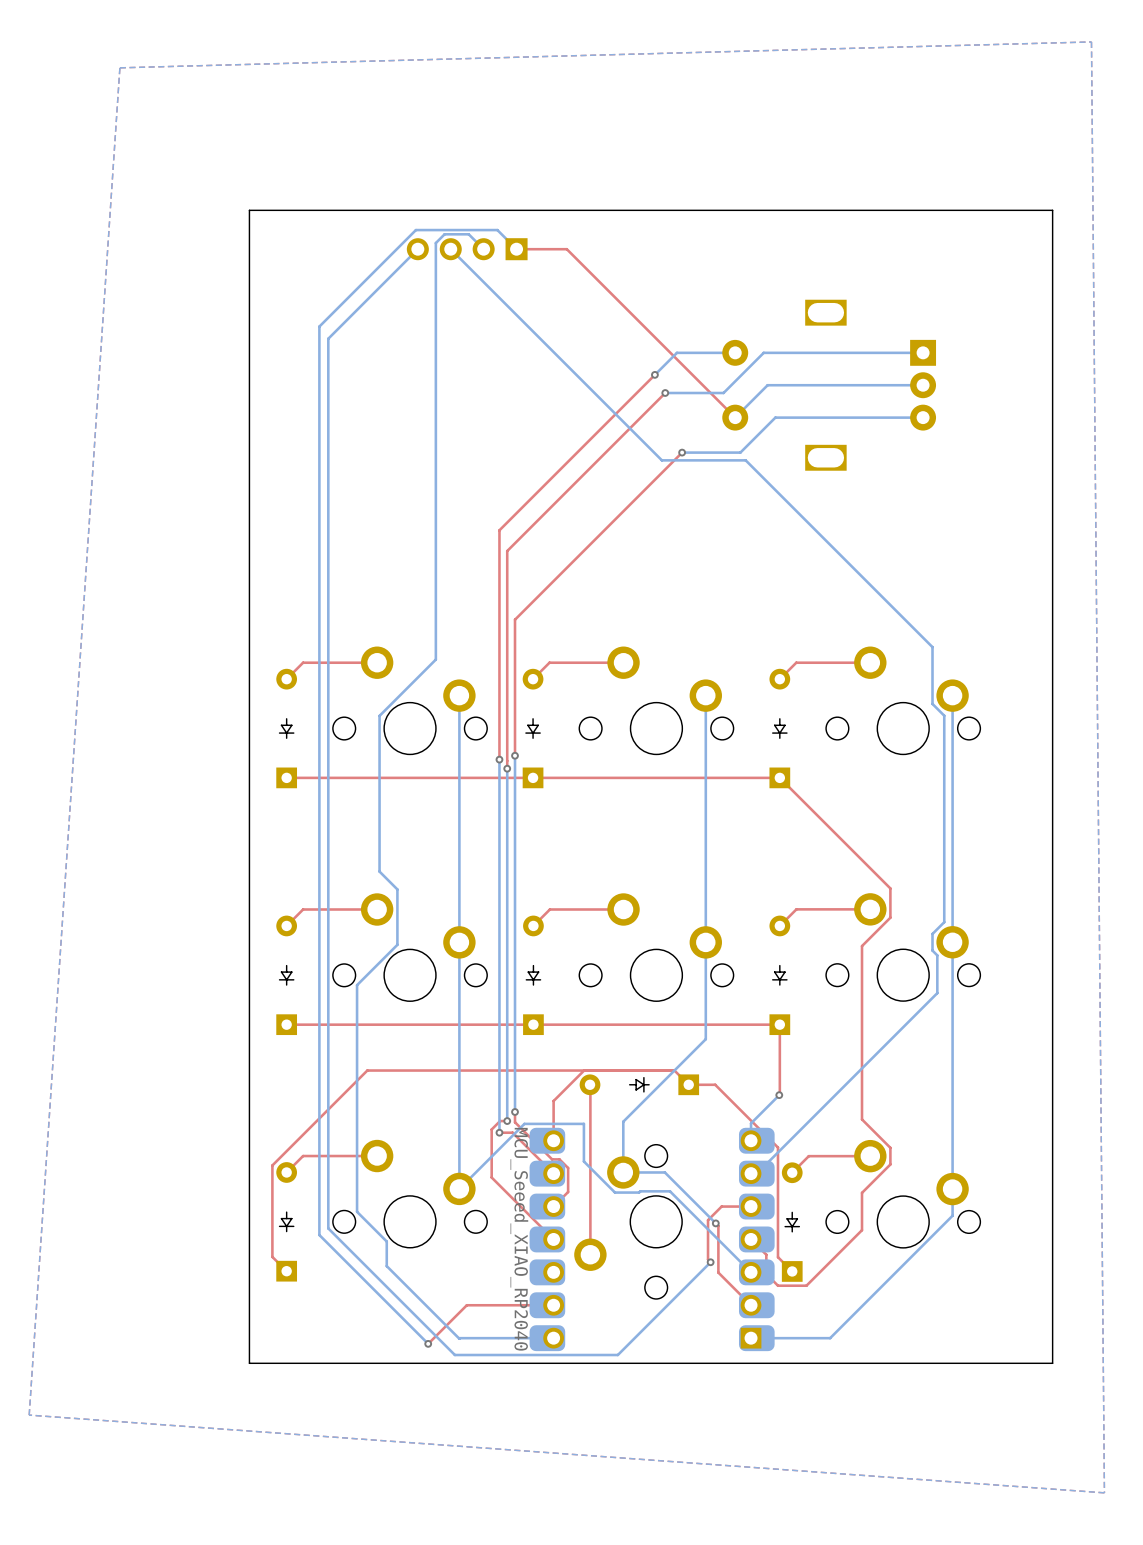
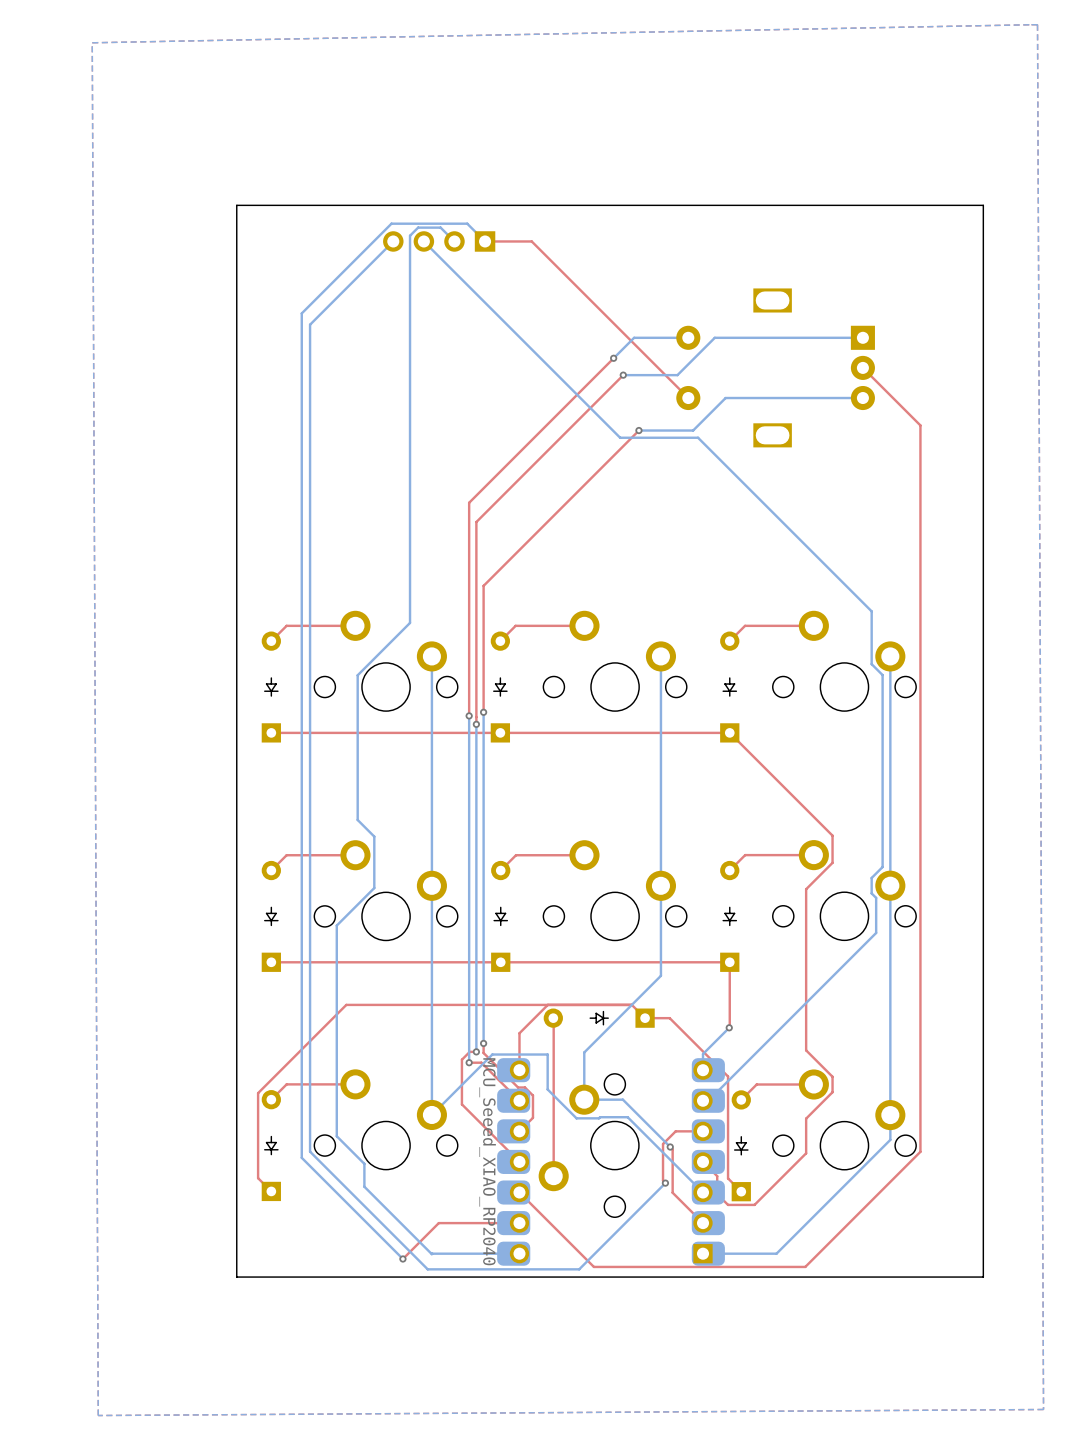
bottom zone outline: (1091, 41) (1104, 1492) (29, 1415) (119, 67) (1091, 41) -> (1037, 24) (1043, 1409) (98, 1415) (92, 42) (1037, 24)
top track: none -> (862, 367) (920, 425) (920, 1151) (805, 1266) (593, 1266) (519, 1192)
bottom track: (923, 385) (767, 385) (735, 417) -> none

